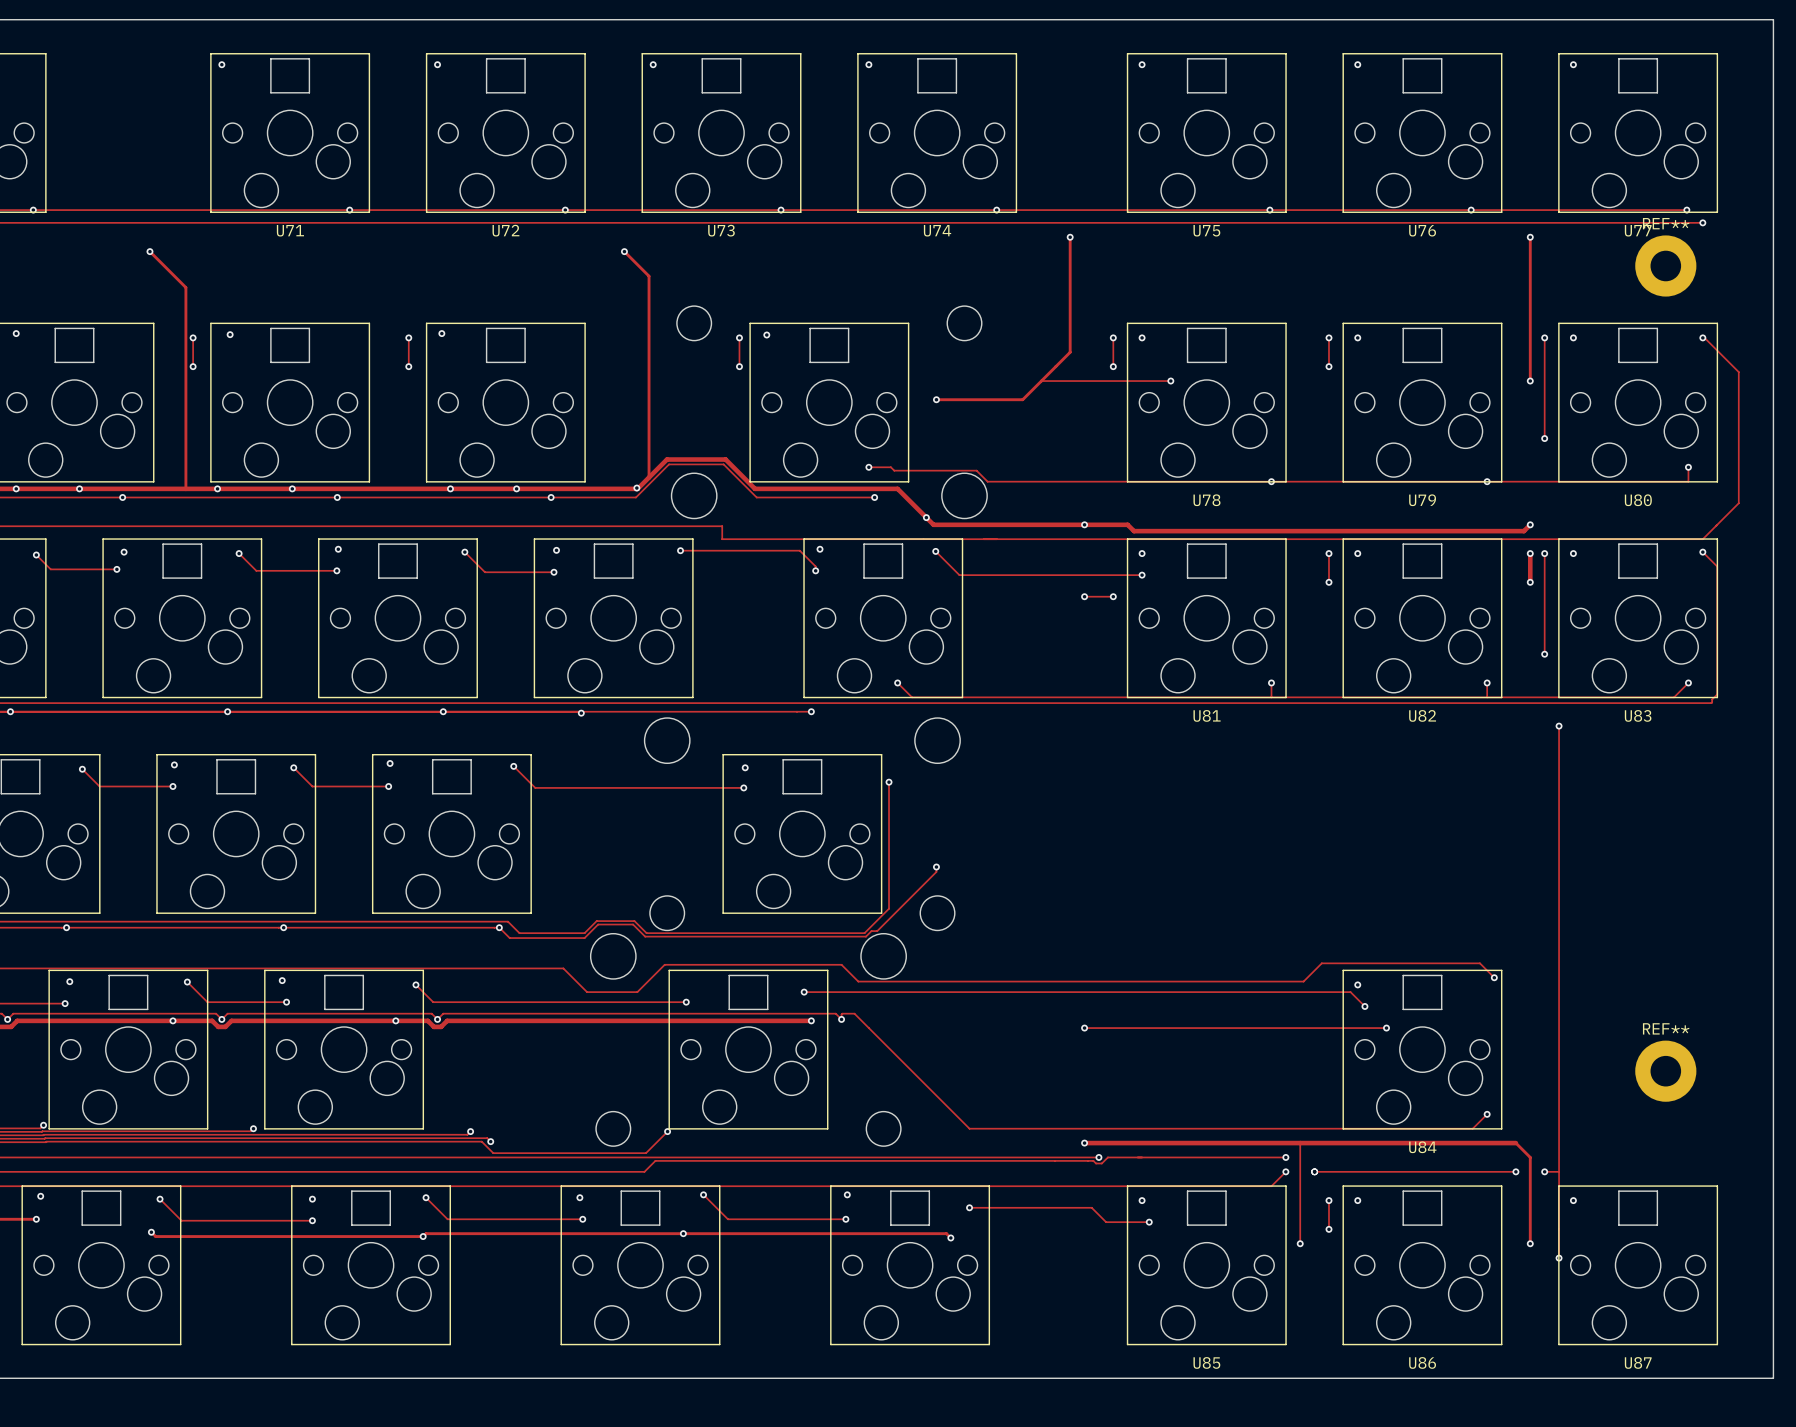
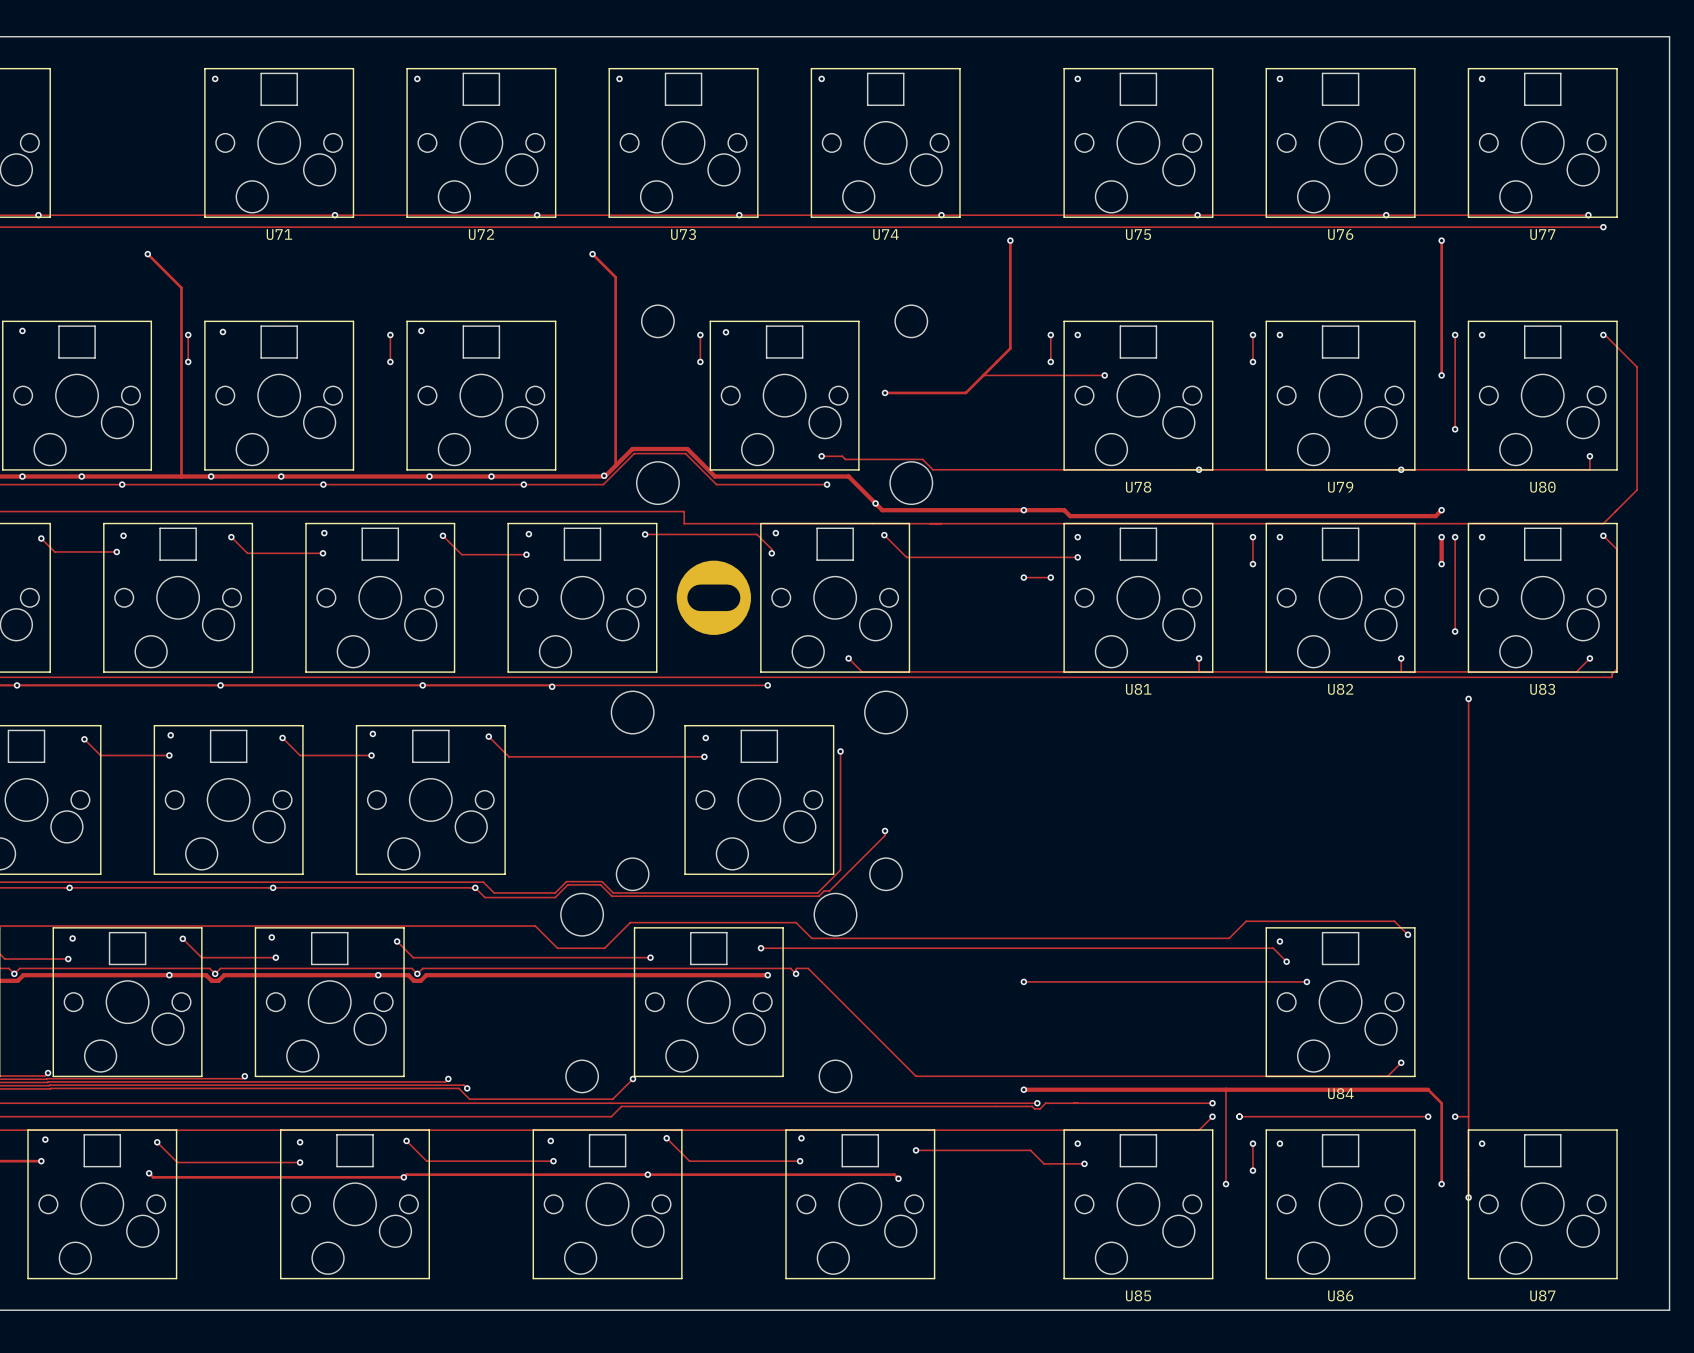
REF**: (1665, 266) -> none
part: none -> (713, 597)
REF**: (1665, 1071) -> none

